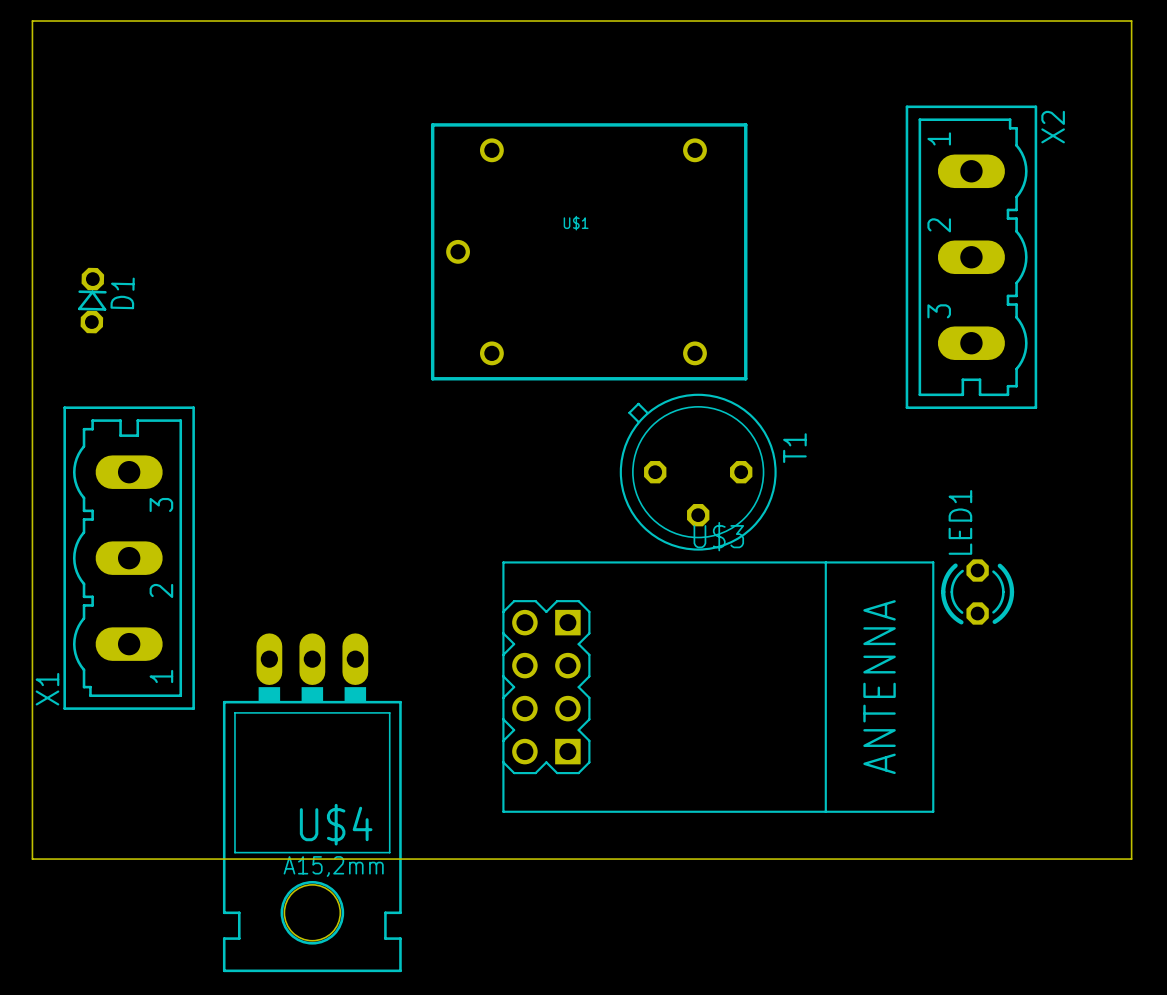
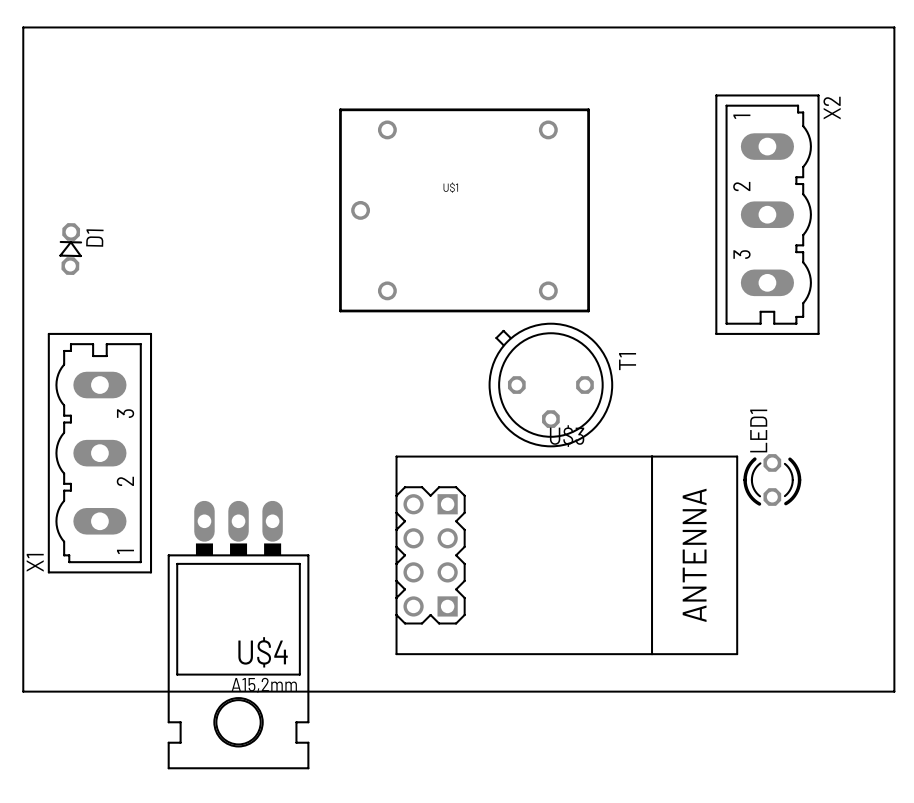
U$4 position: (312, 802) -> (238, 635)

